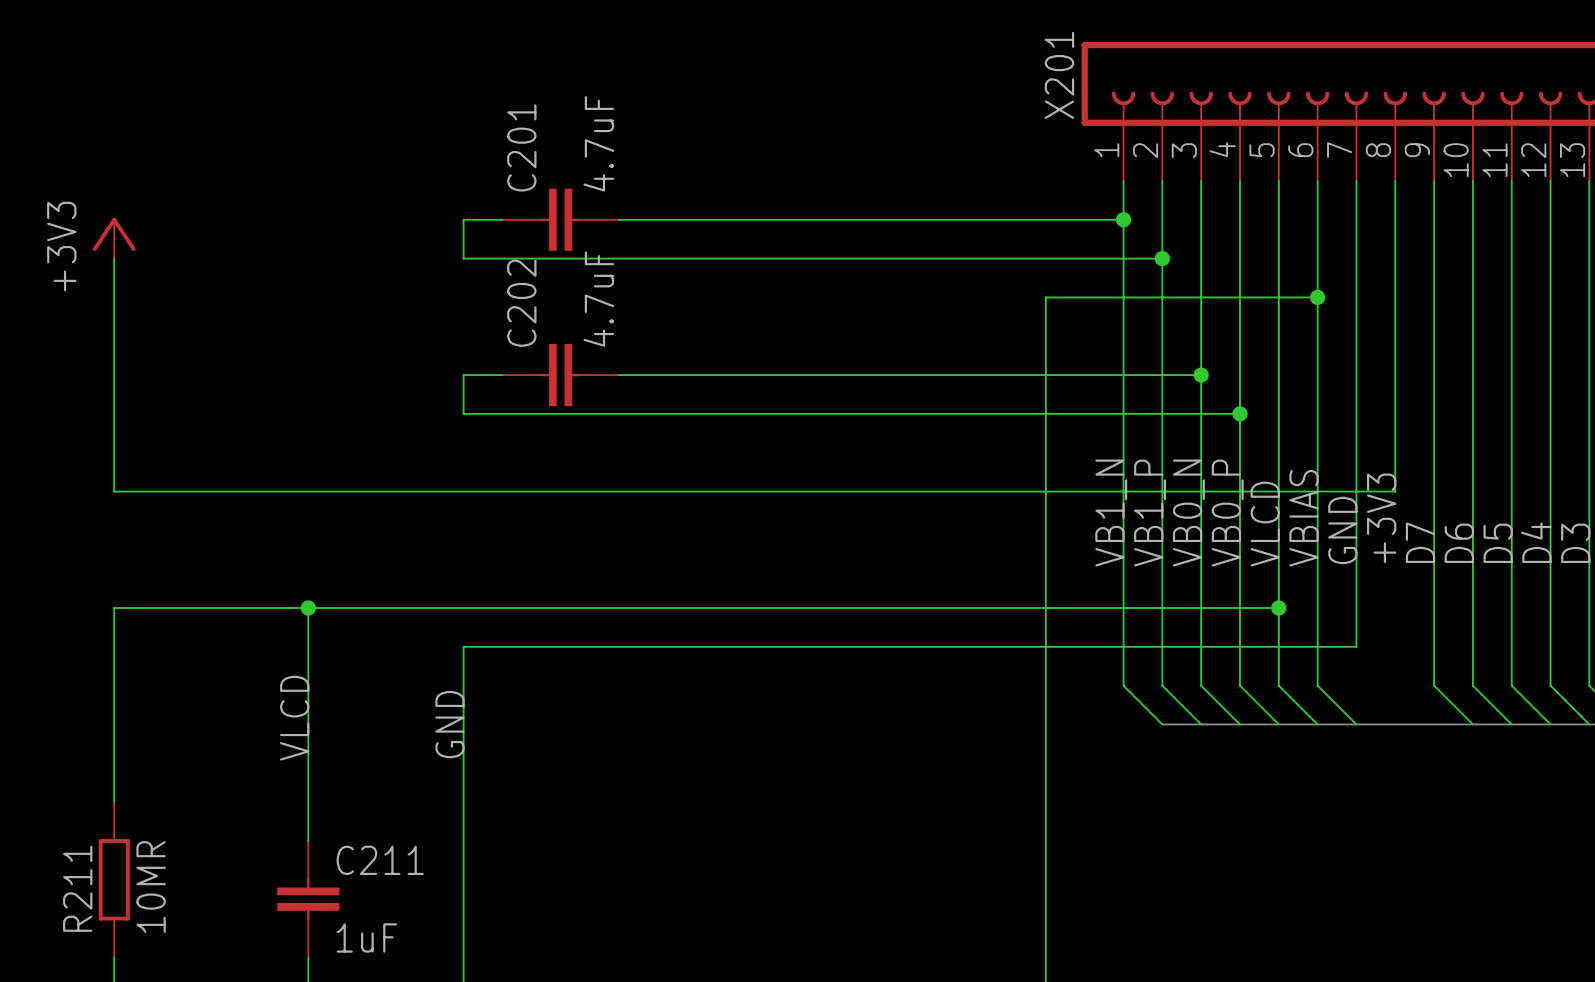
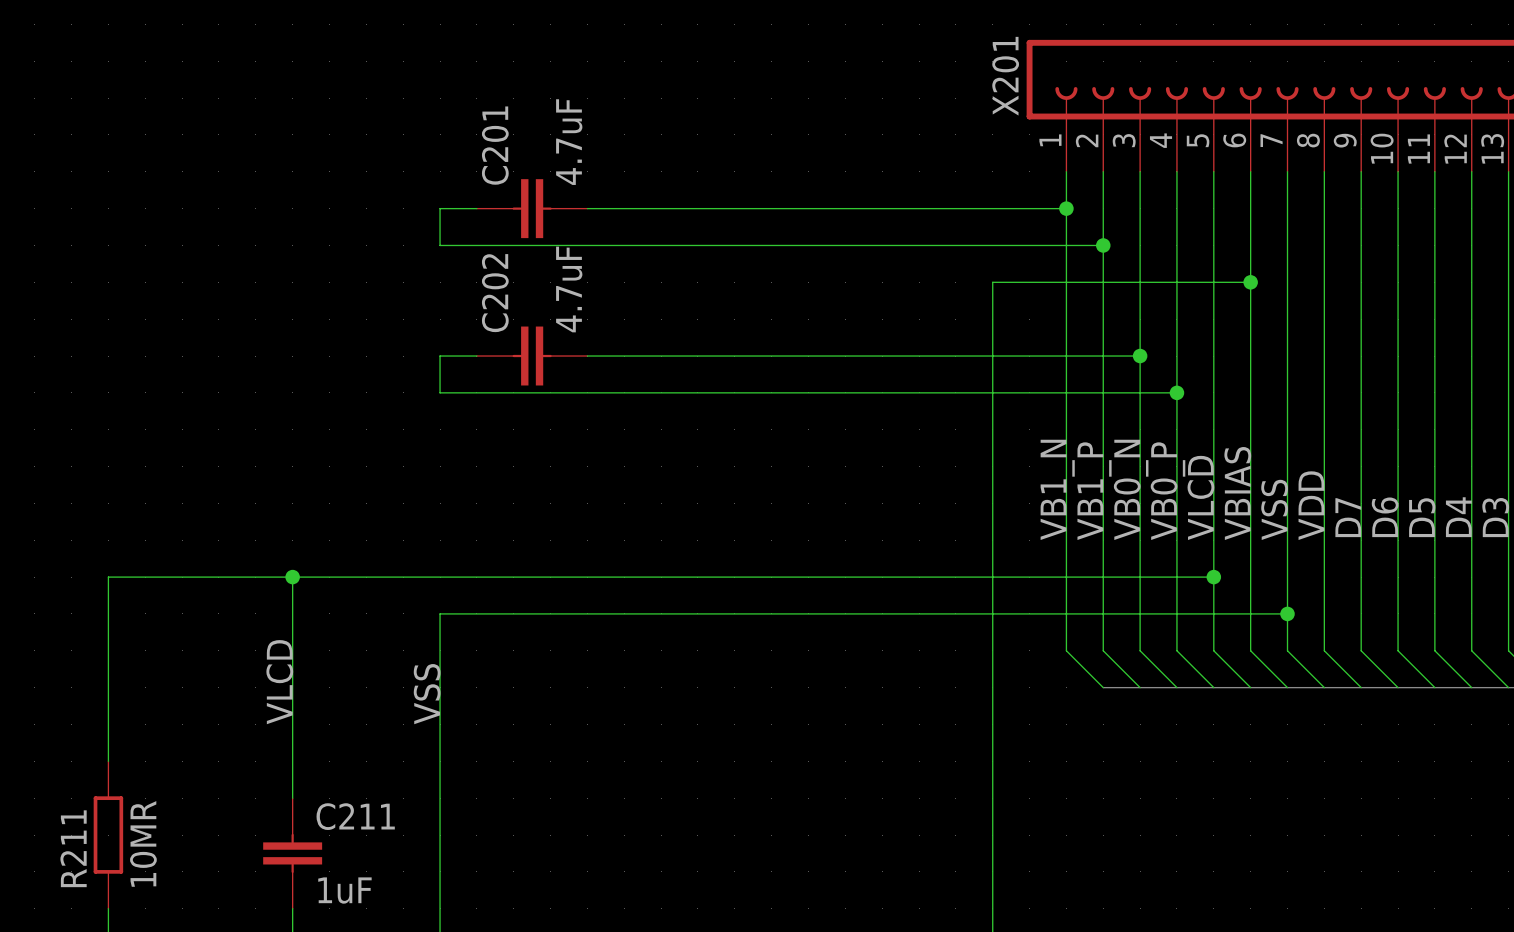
power symbol: +3V3 (114, 238) -> none
wire: (114, 258) (114, 491) (1395, 491) -> (1361, 687) (1324, 650) (1324, 466)
label: +3V3 (1381, 518) -> VDD (1311, 505)
label: GND (1342, 530) -> VSS (1274, 509)
wire: none -> (1287, 613) (1287, 650) (1324, 687)
junction: none -> (1287, 613)
label: GND (450, 724) -> VSS (427, 694)

